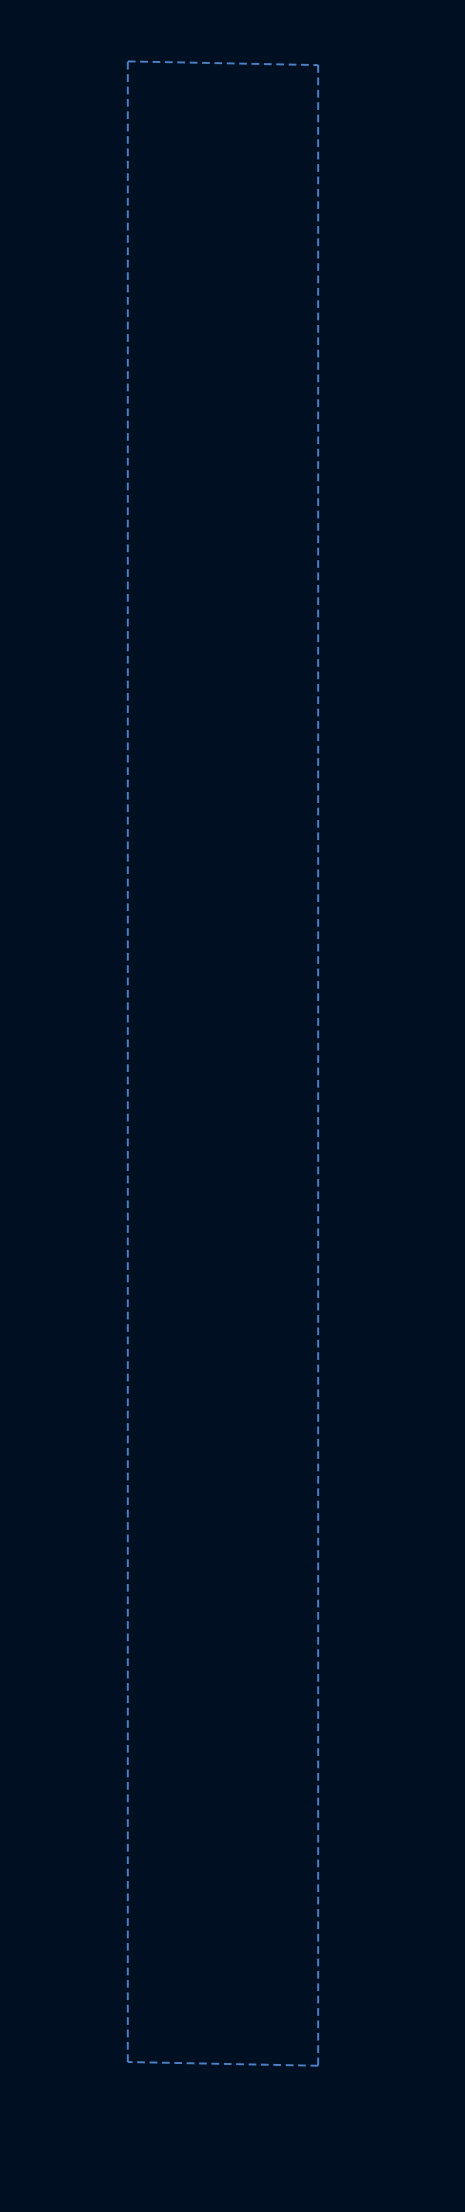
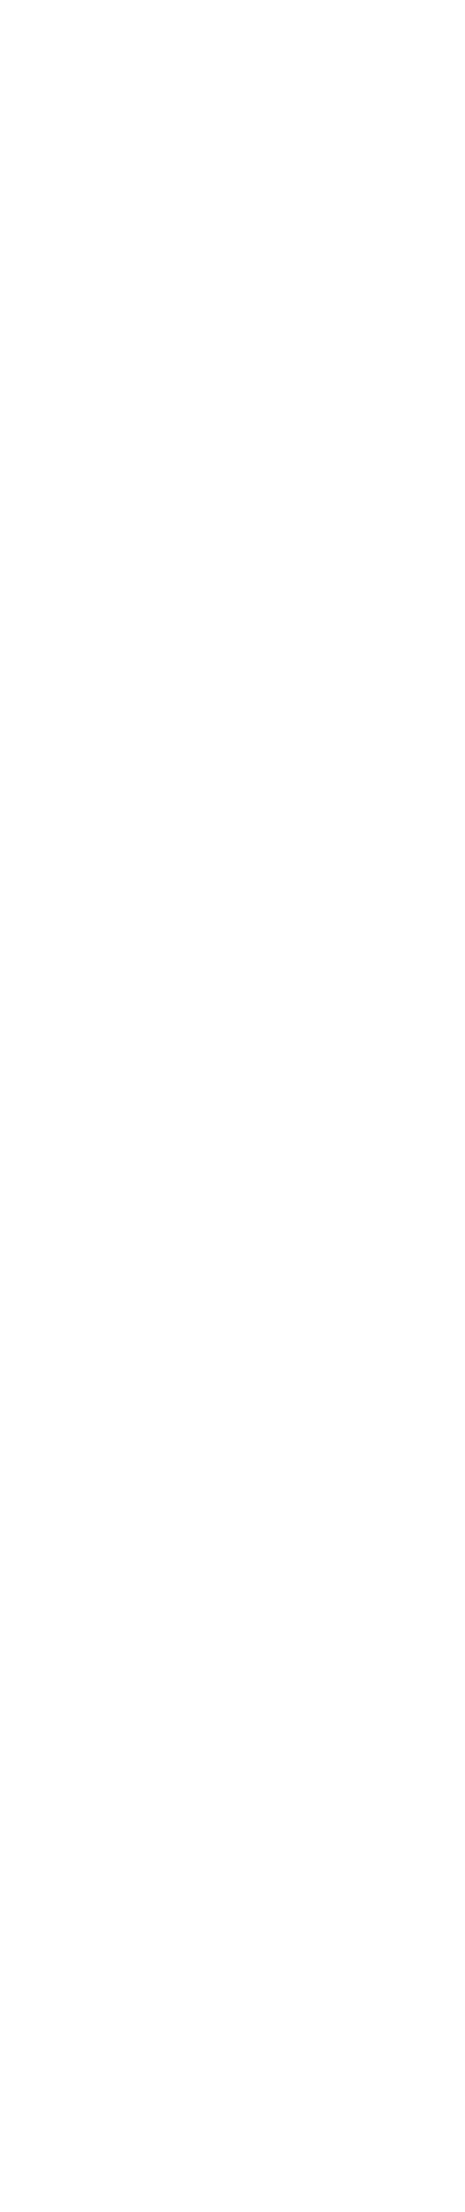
zone outline: (127, 61) (127, 2062) (318, 2065) (318, 65) (127, 61) -> none

